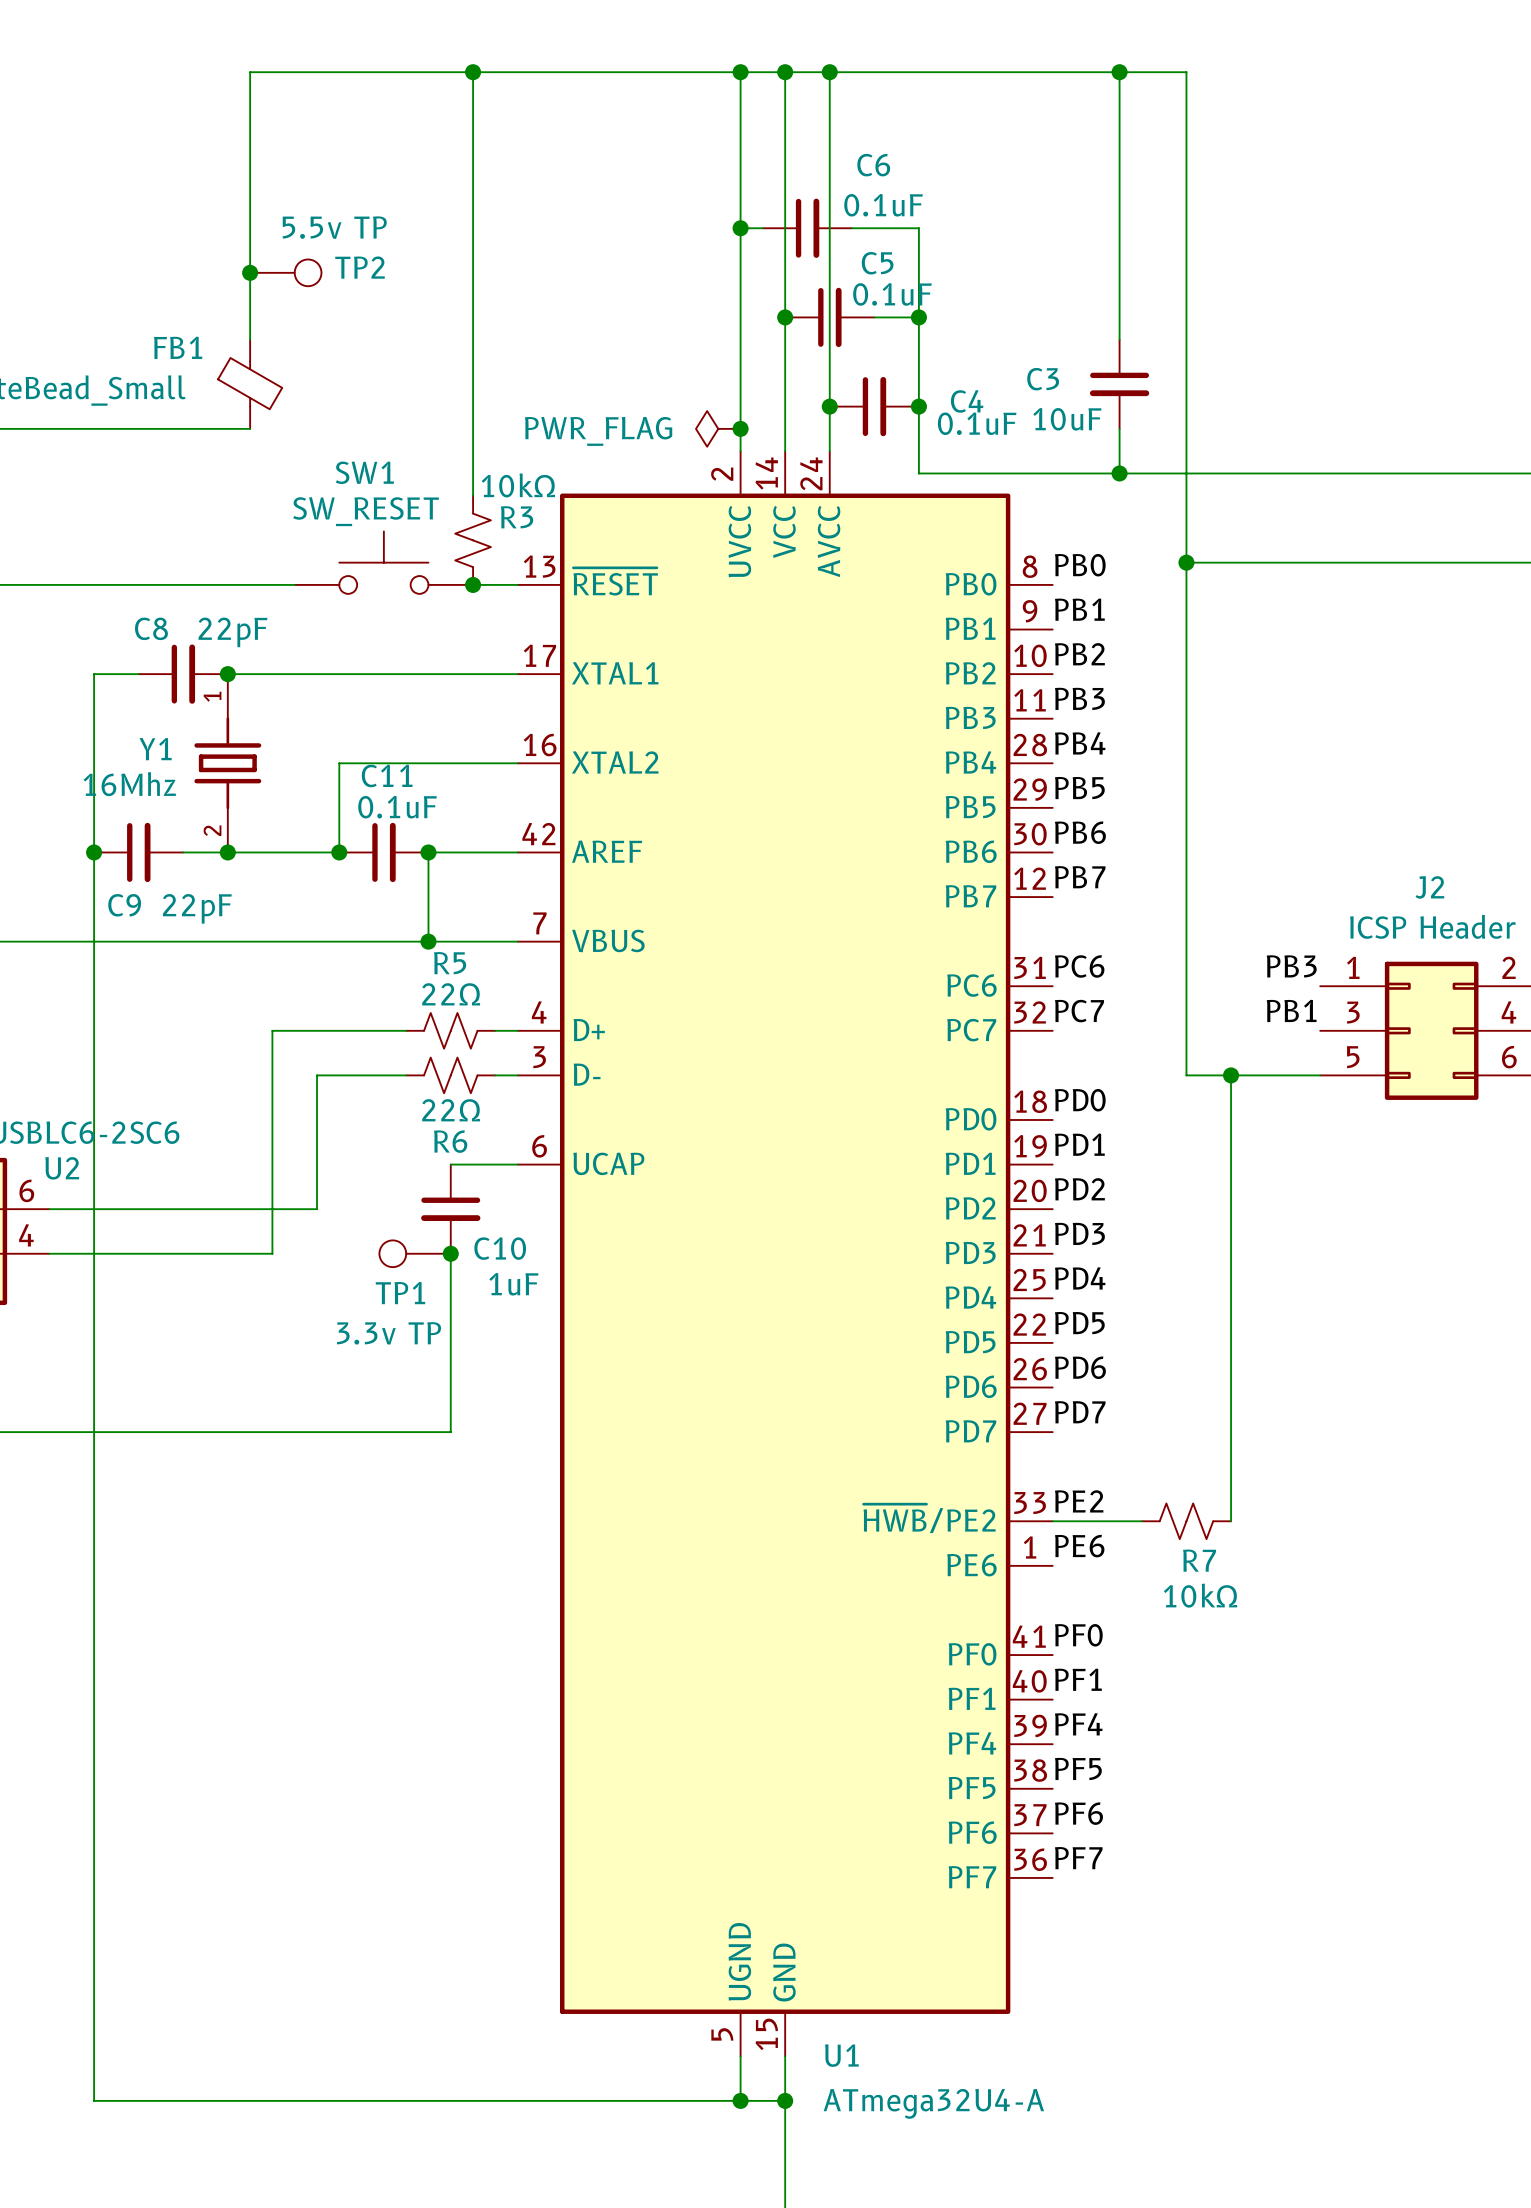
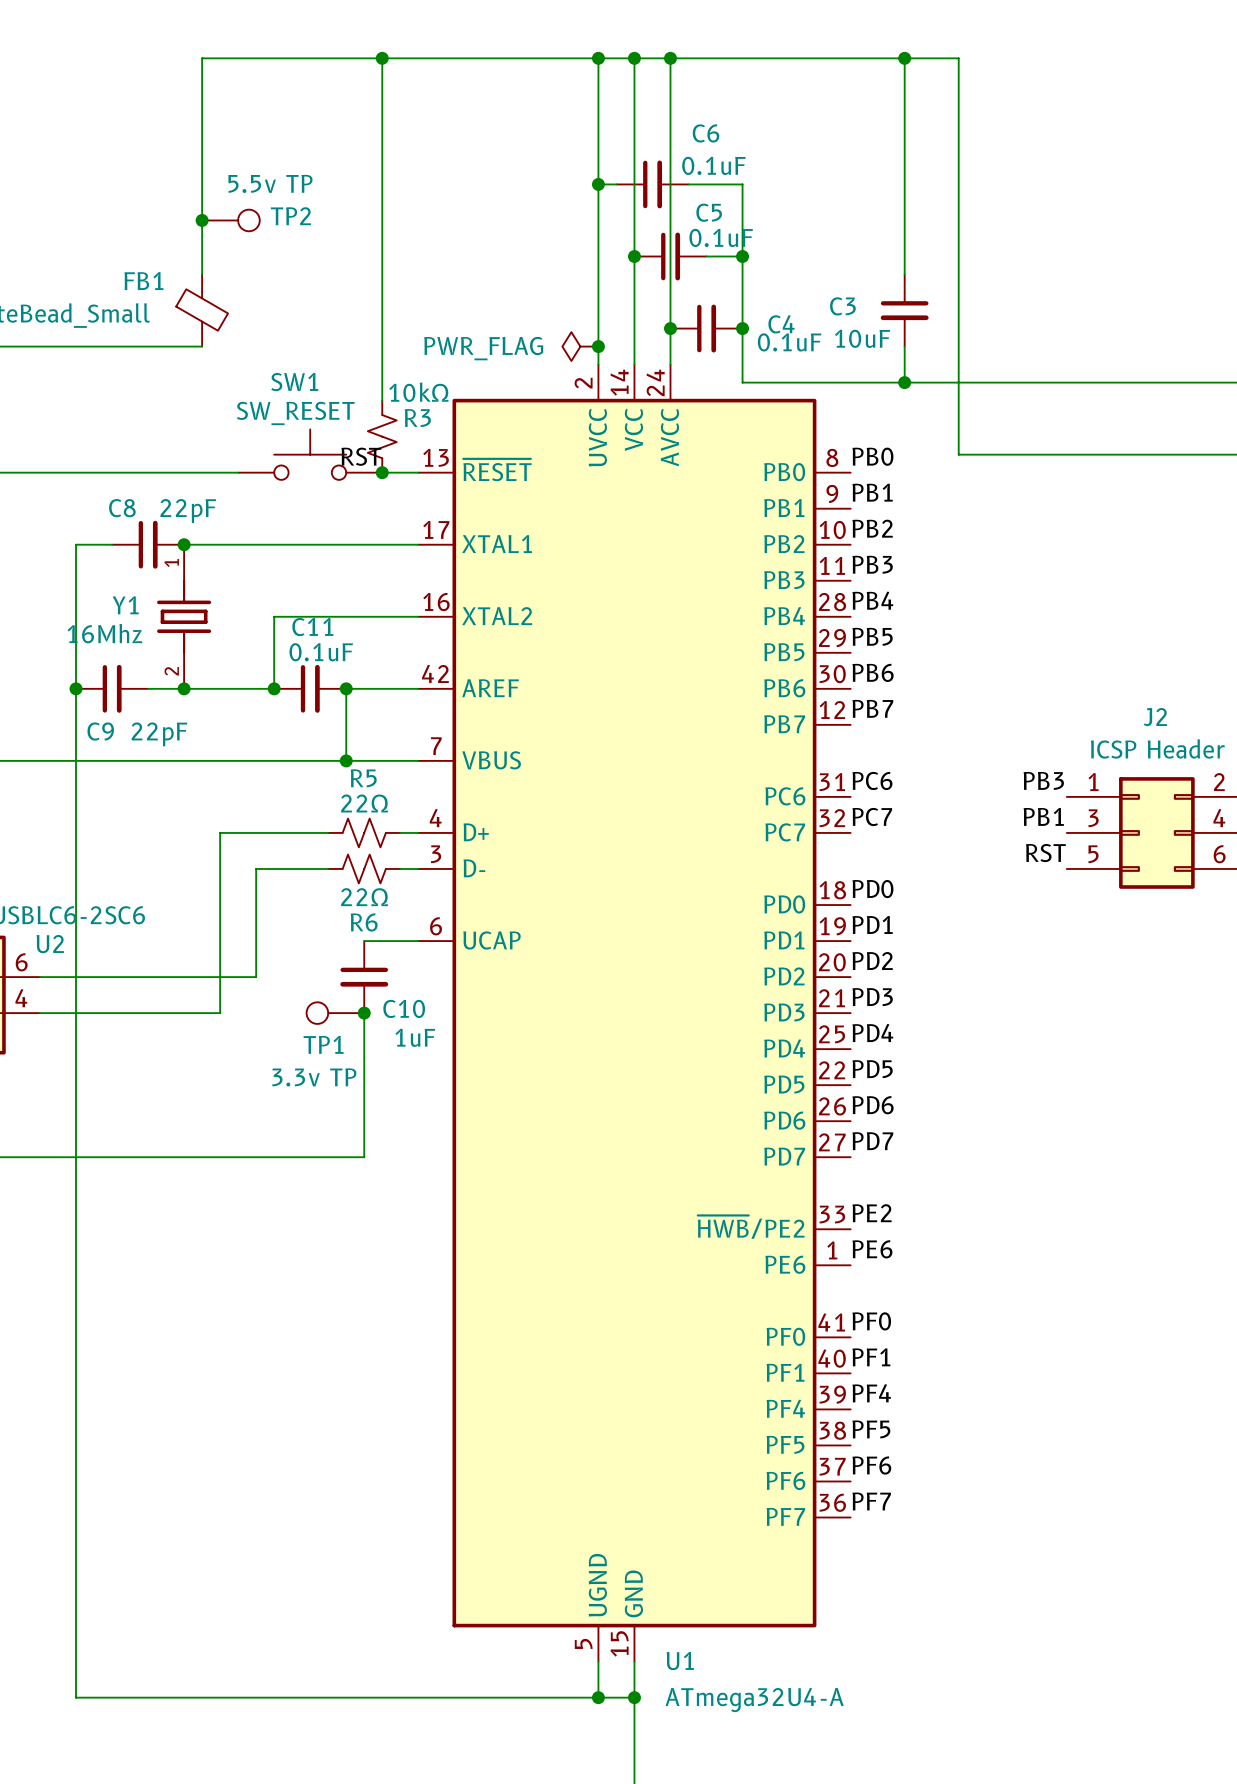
wire: (1186, 562) (1186, 1075) (1320, 1075) -> none
junction: (1186, 562) -> none
label: none -> RST (361, 456)
label: none -> RST (1045, 853)
wire: (1231, 1075) (1231, 1521) -> none
junction: (1231, 1075) -> none
wire: (1052, 1521) (1141, 1521) -> none
R7: 10kΩ (1186, 1521) -> none

